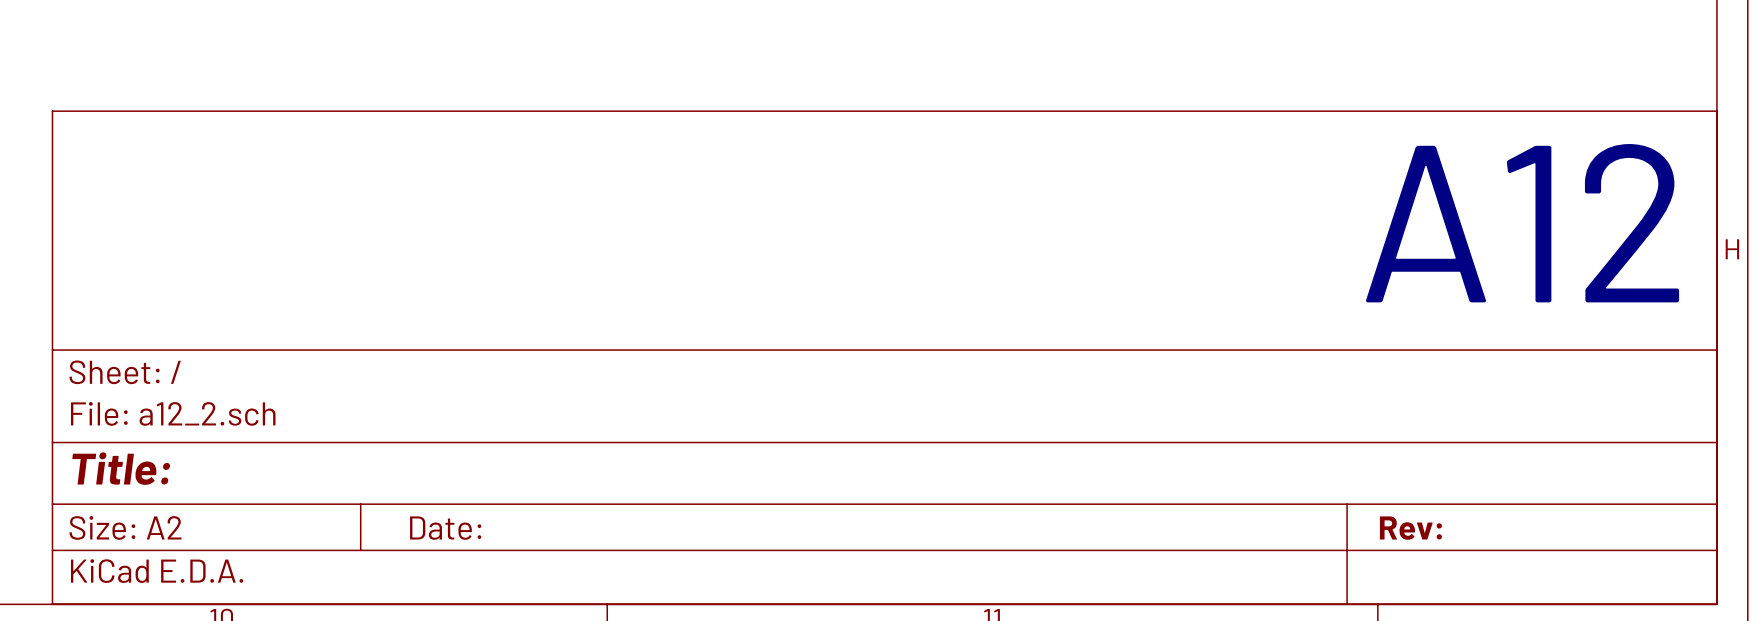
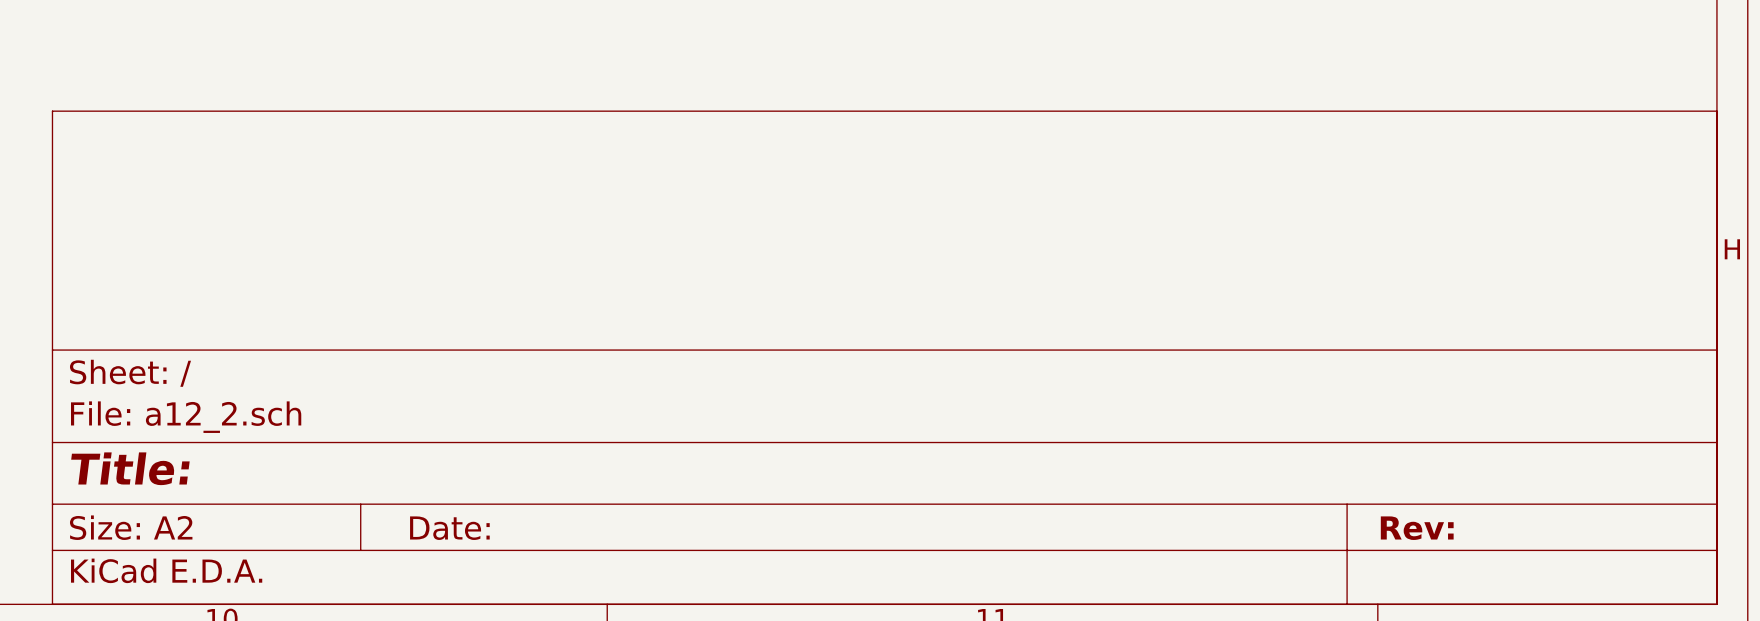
text: A12 (1522, 223) -> none

